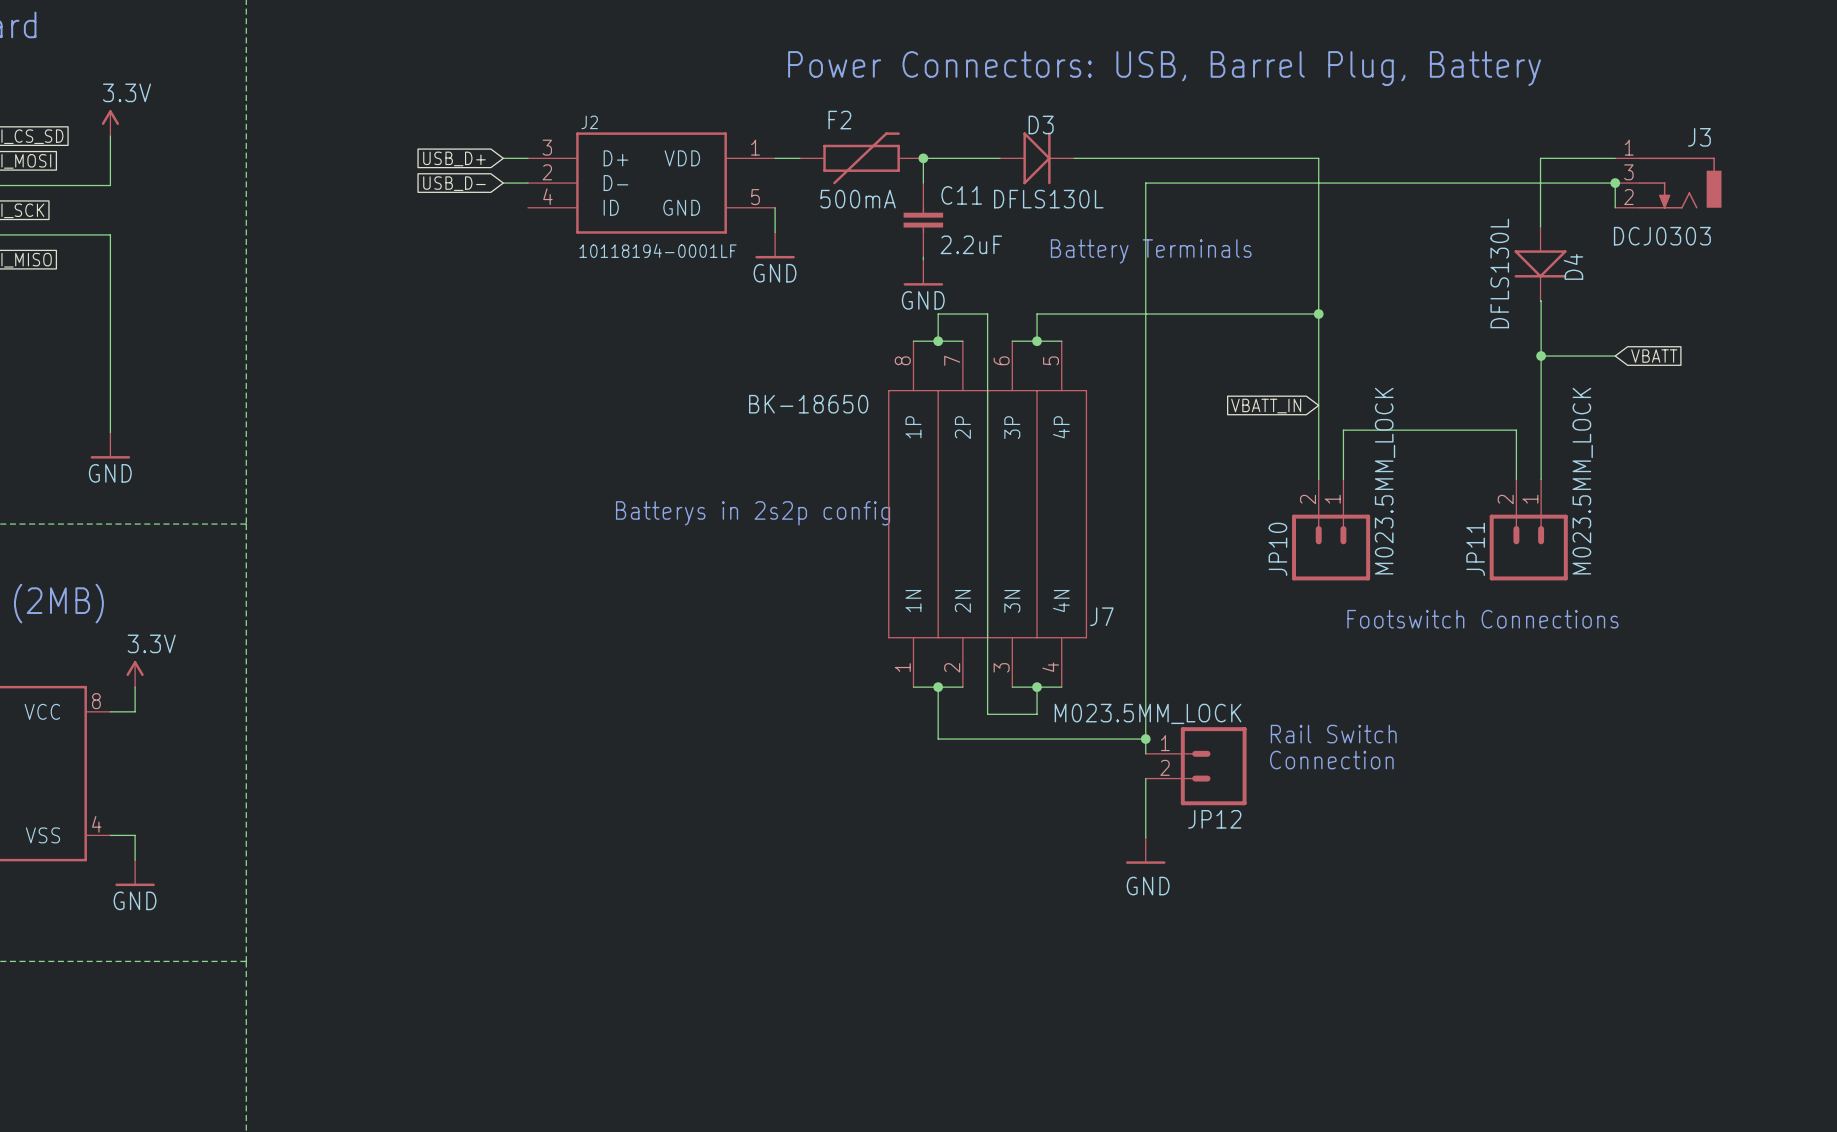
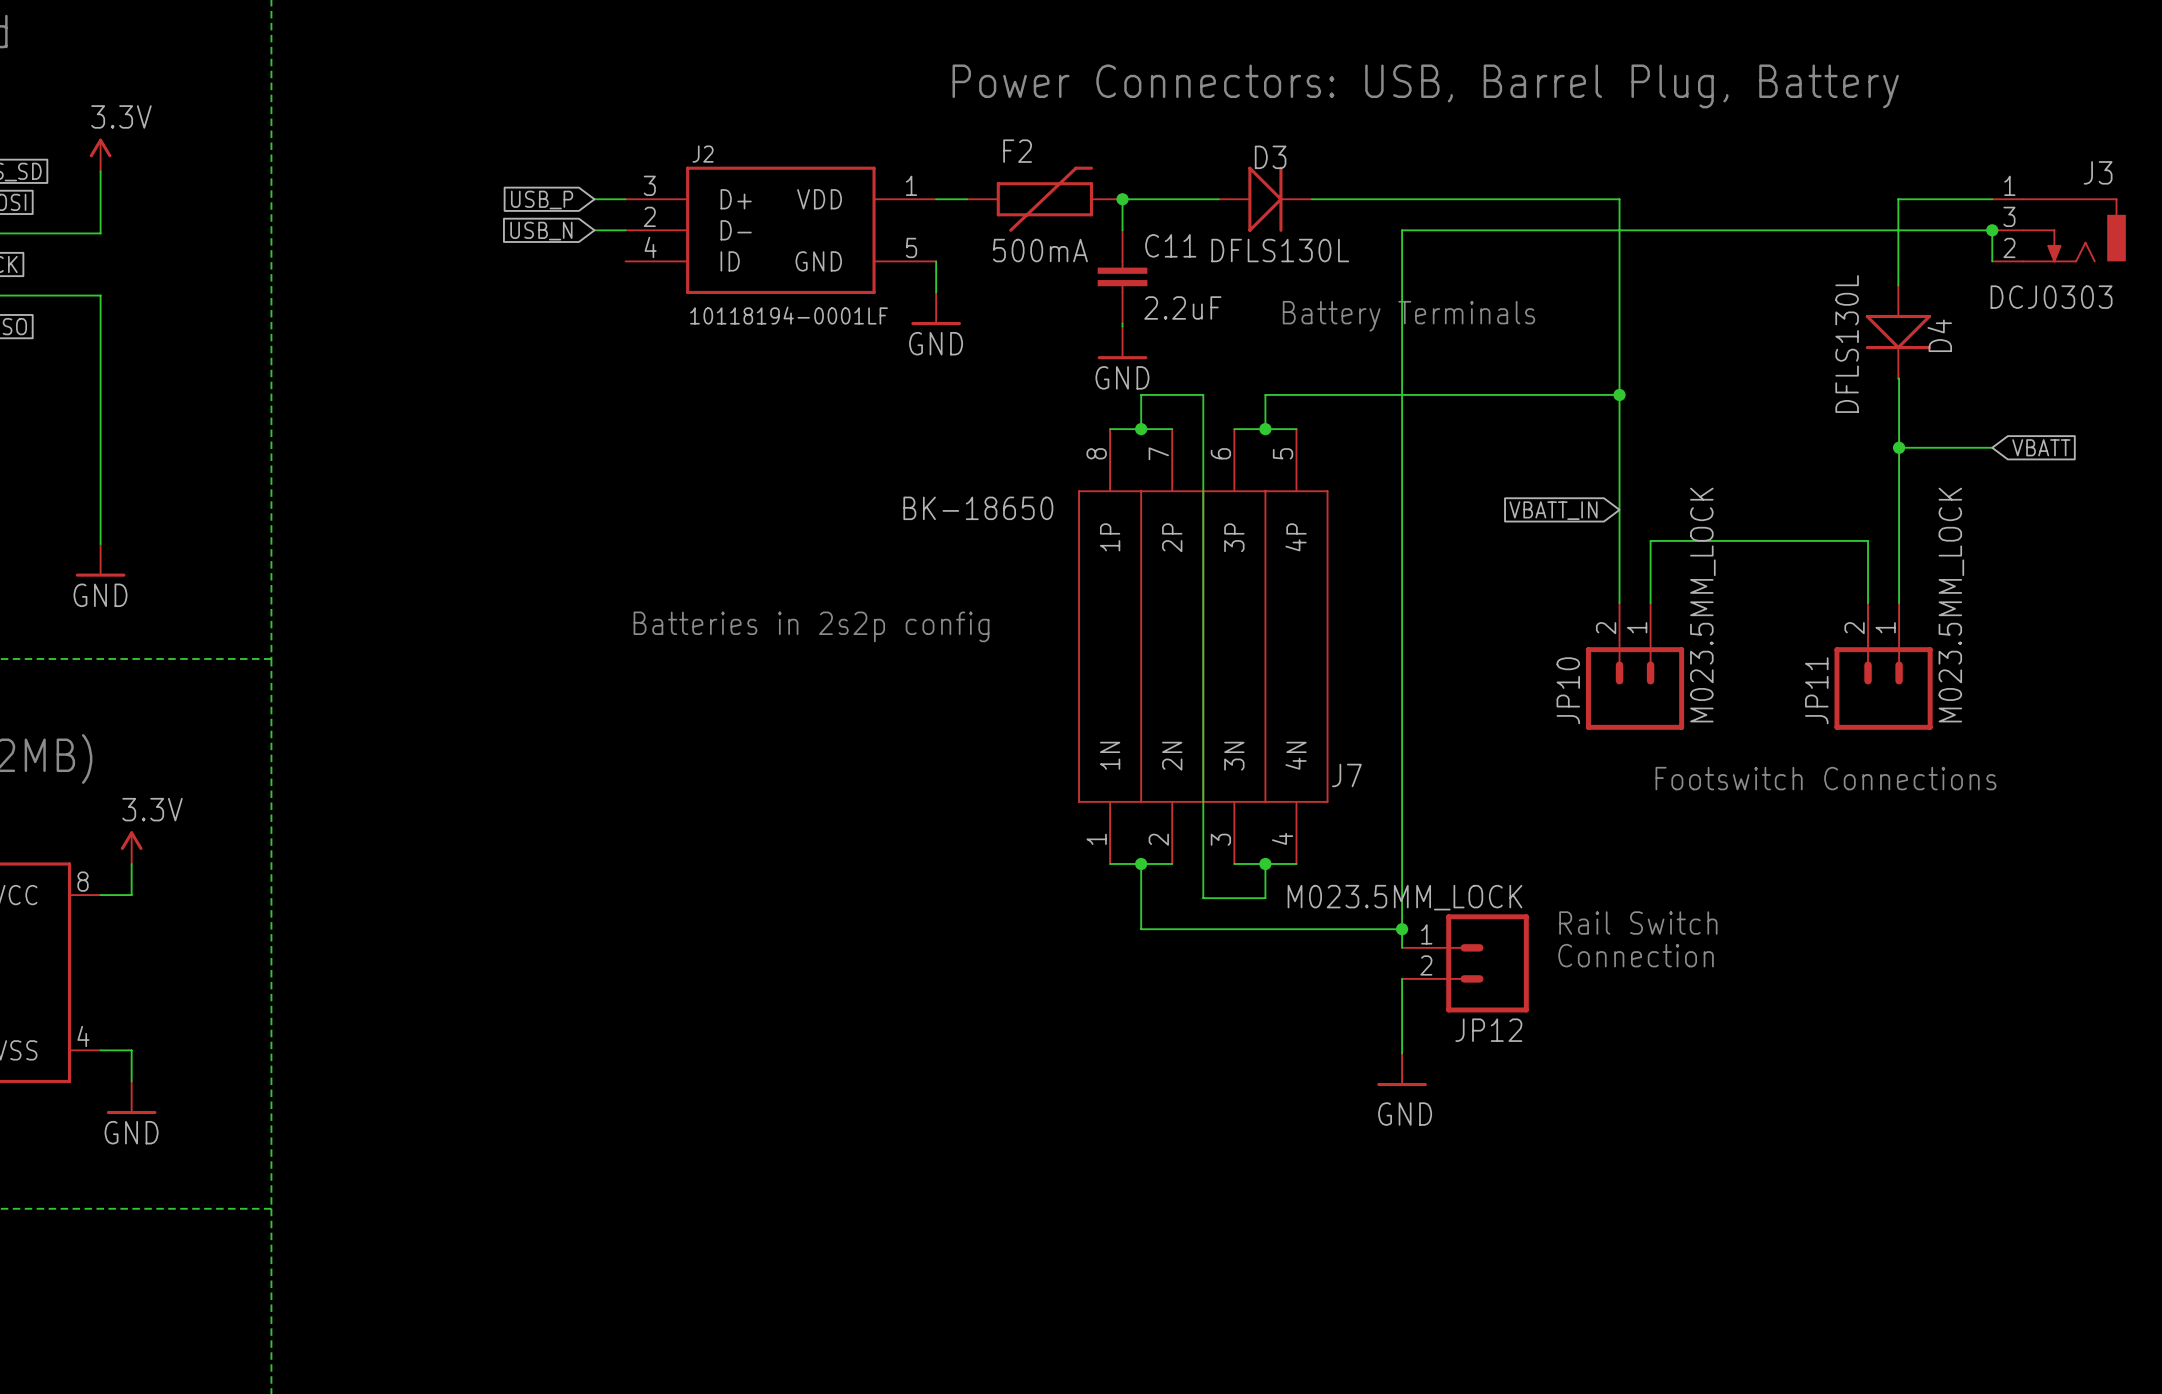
global label: USB_D+ (454, 158) -> USB_P (542, 200)
global label: USB_D- (454, 183) -> USB_N (541, 231)
text: Batterys in 2s2p config (753, 513) -> Batteries in 2s2p config (811, 626)

